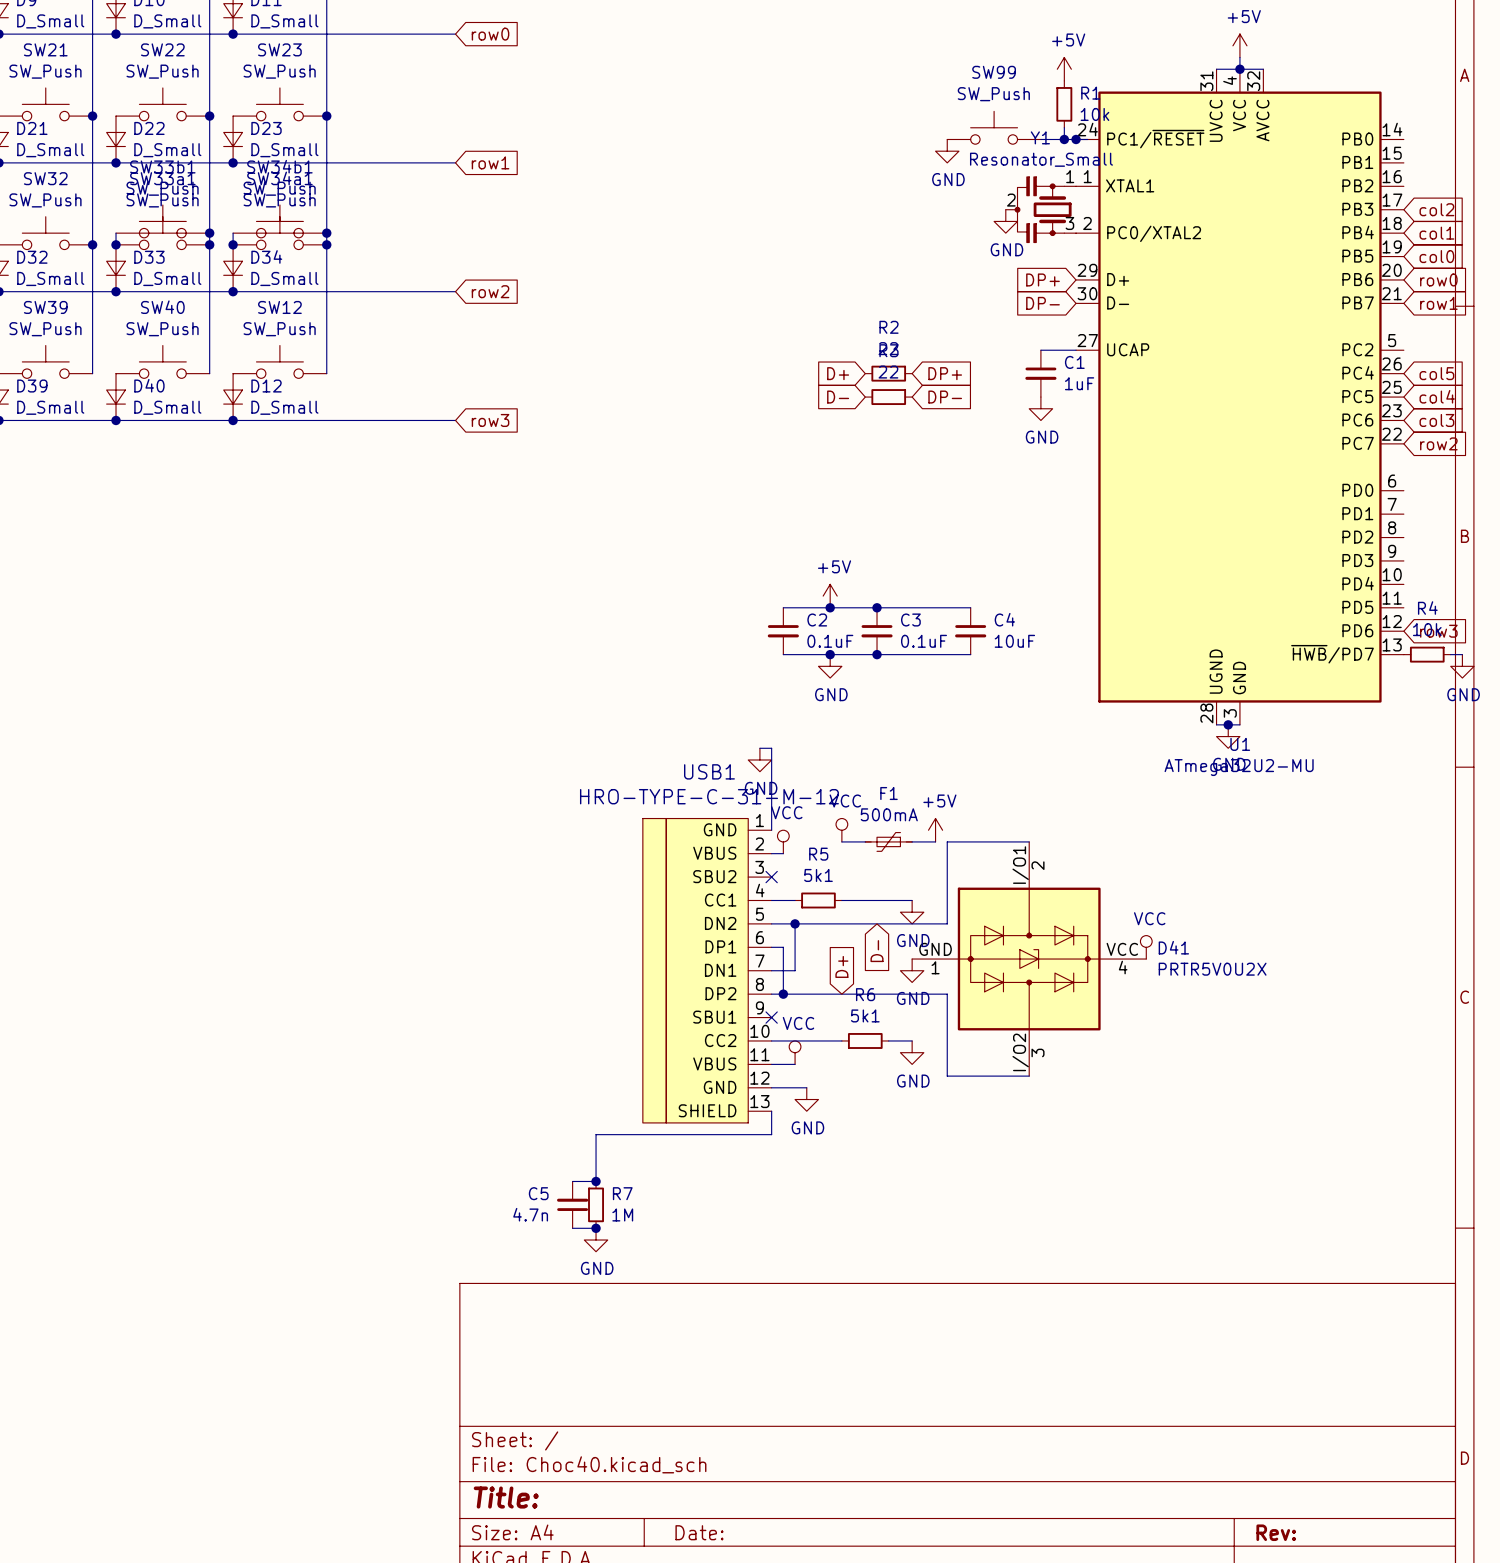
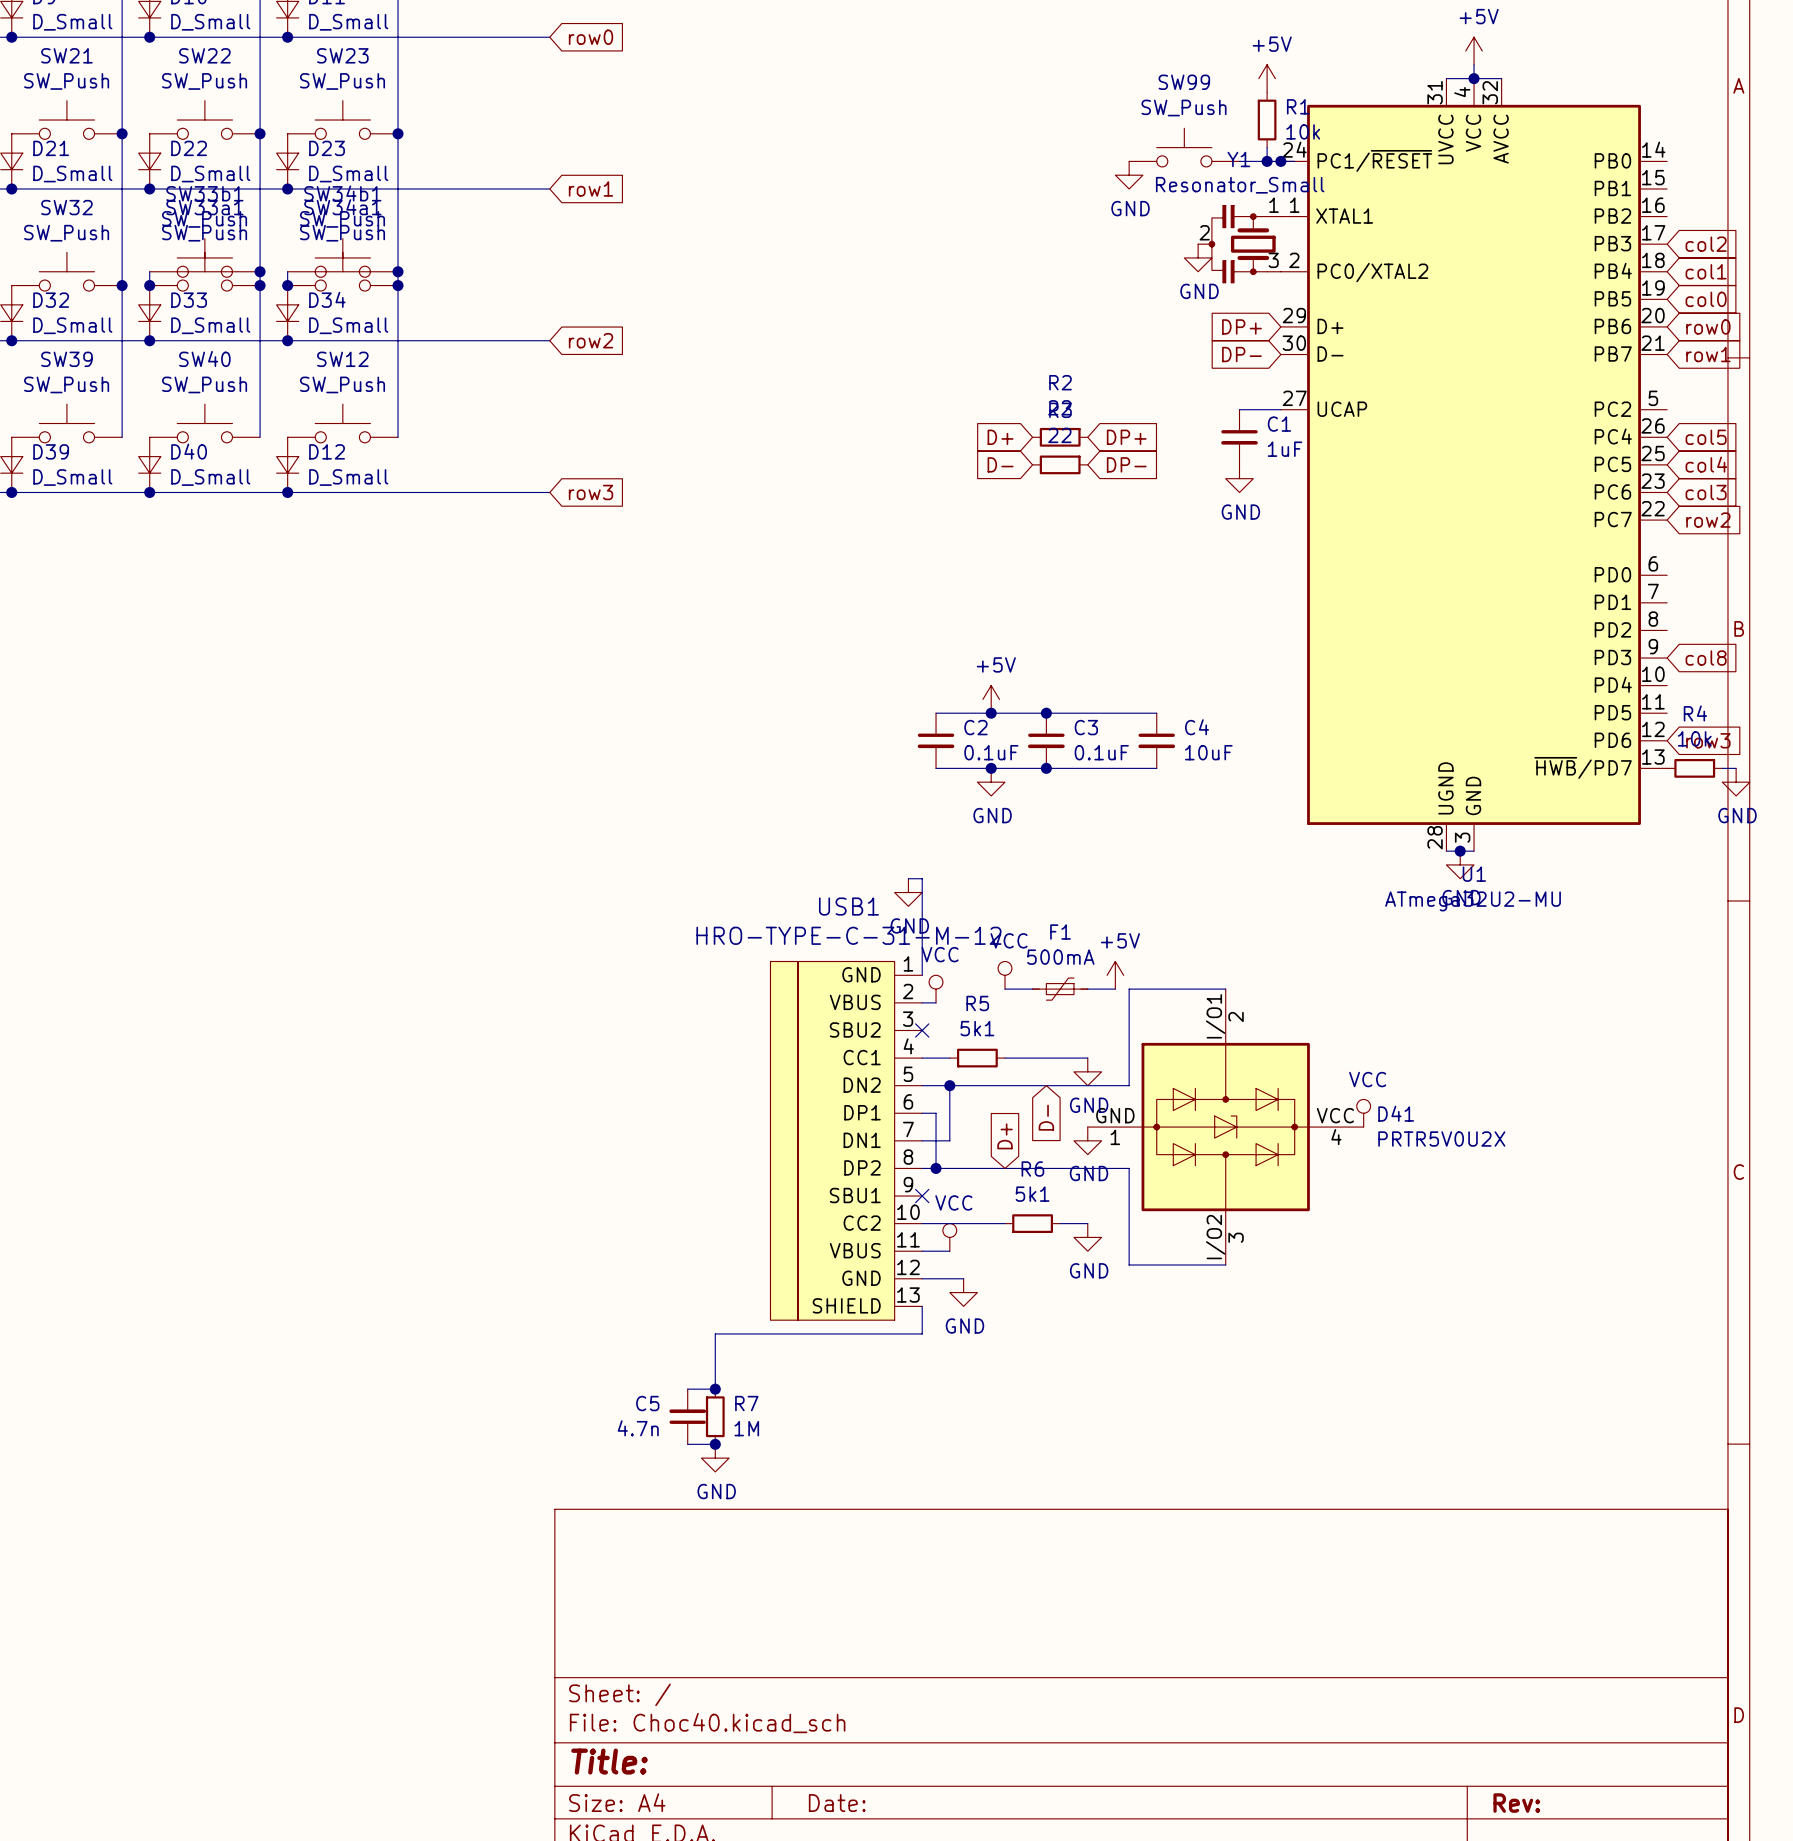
global label: none -> col8 (1706, 658)

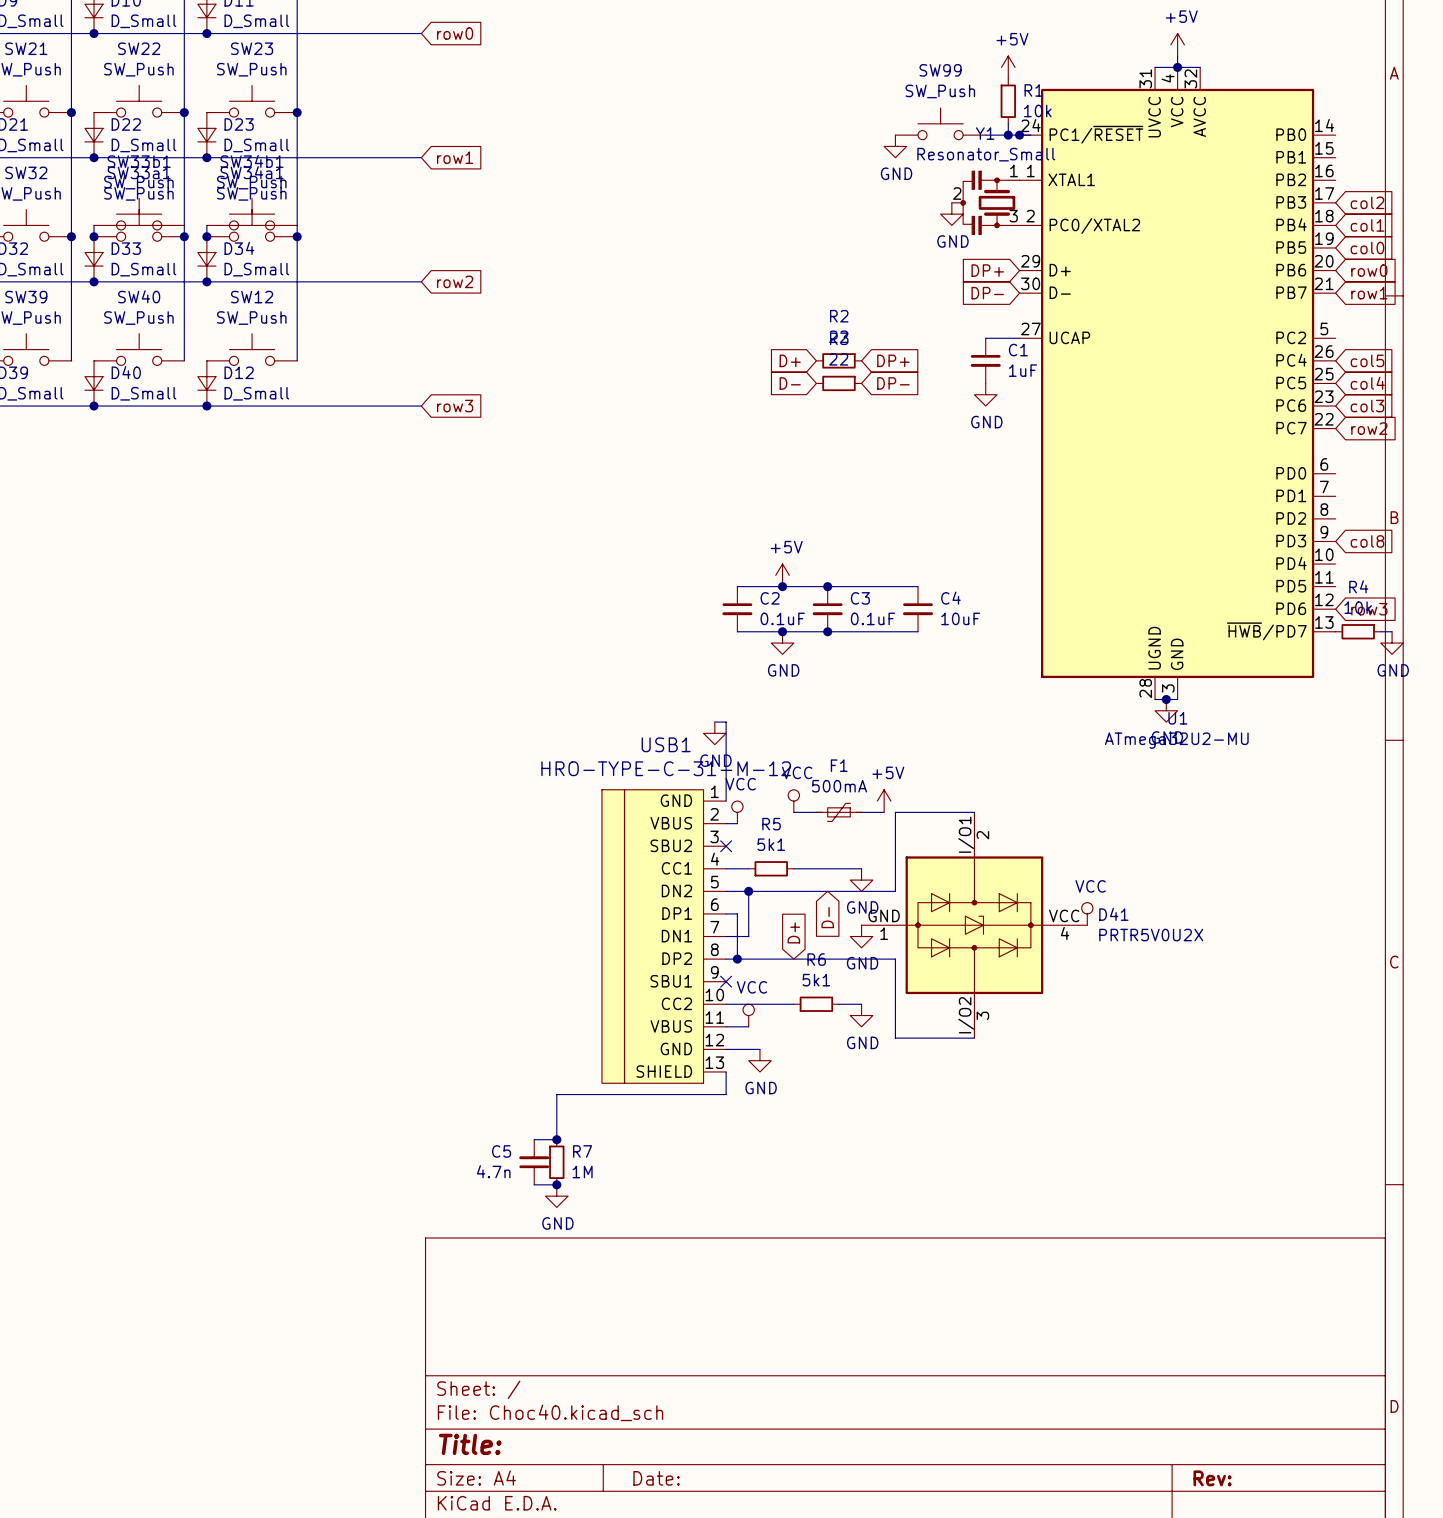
junction: (260, 271) -> none
junction: (398, 271) -> none

